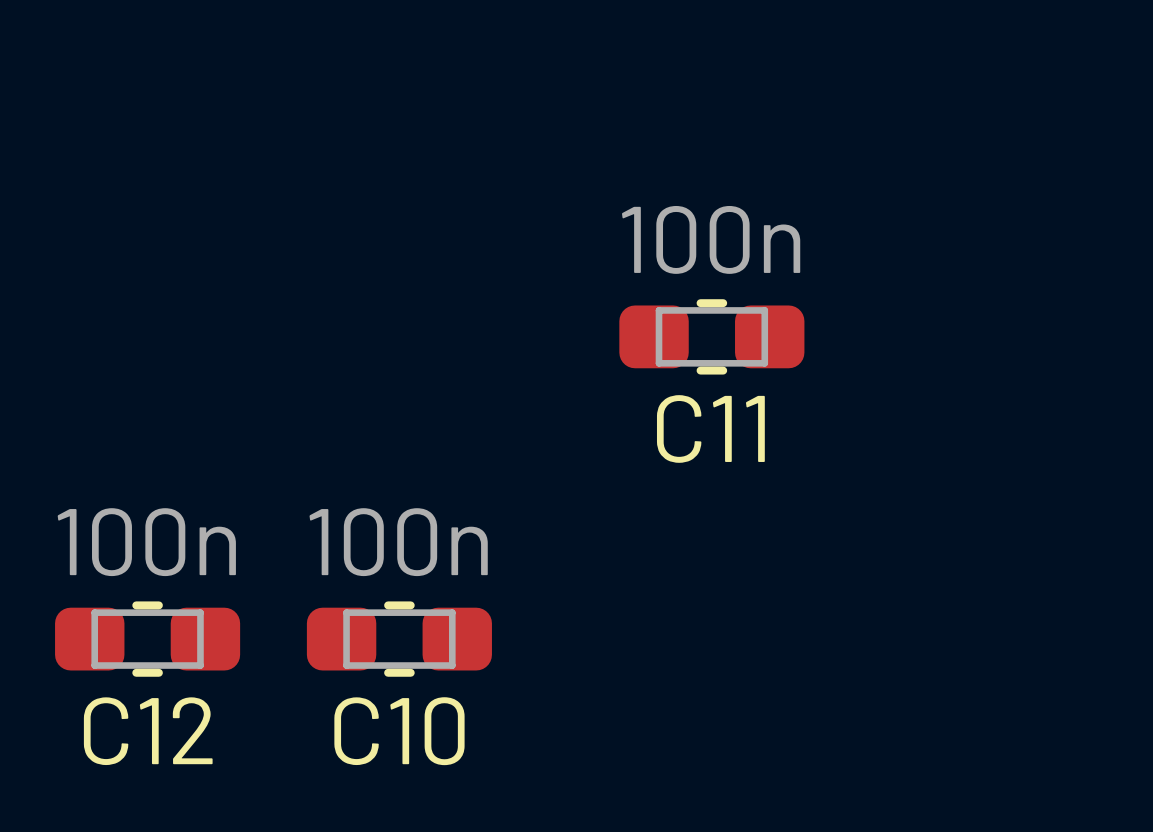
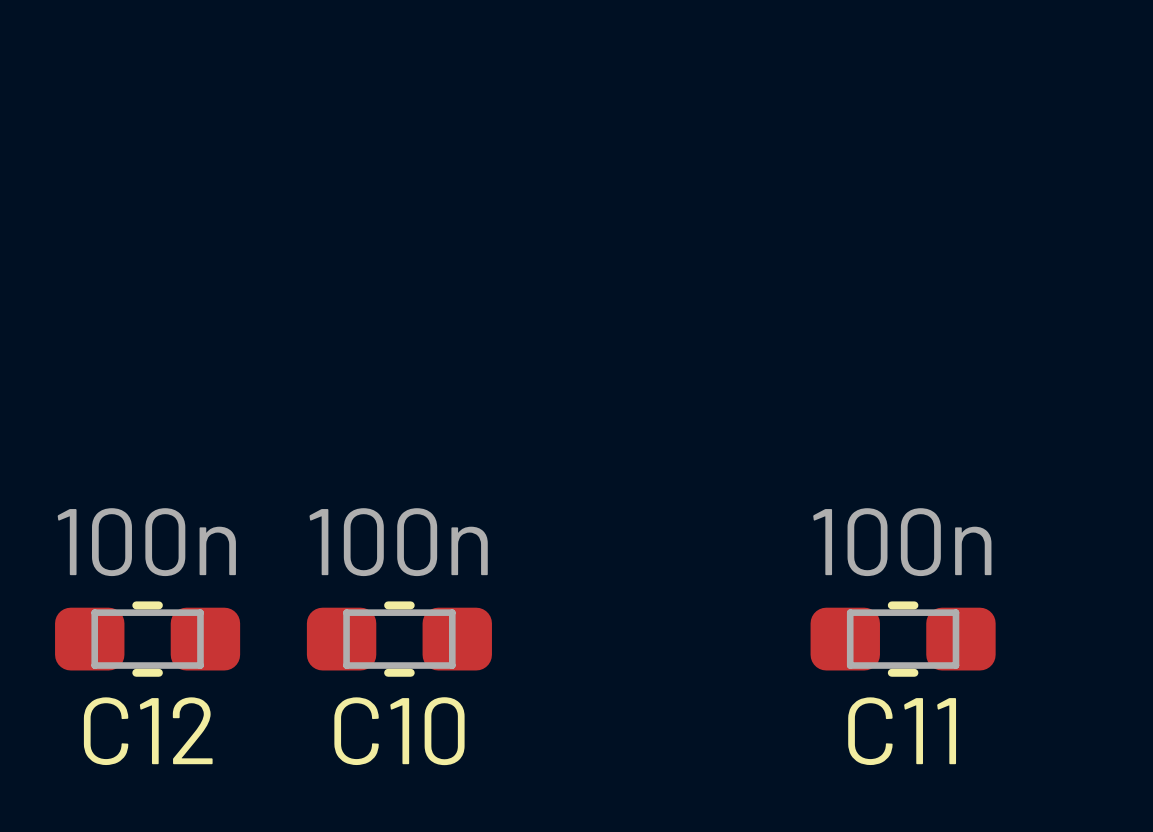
C11 position: (711, 336) -> (903, 639)

